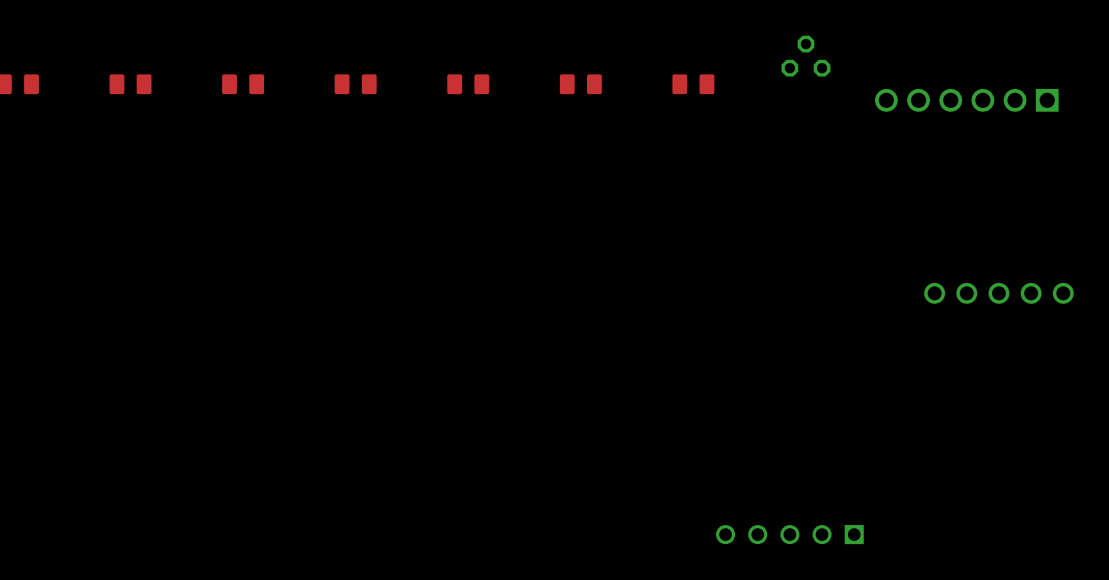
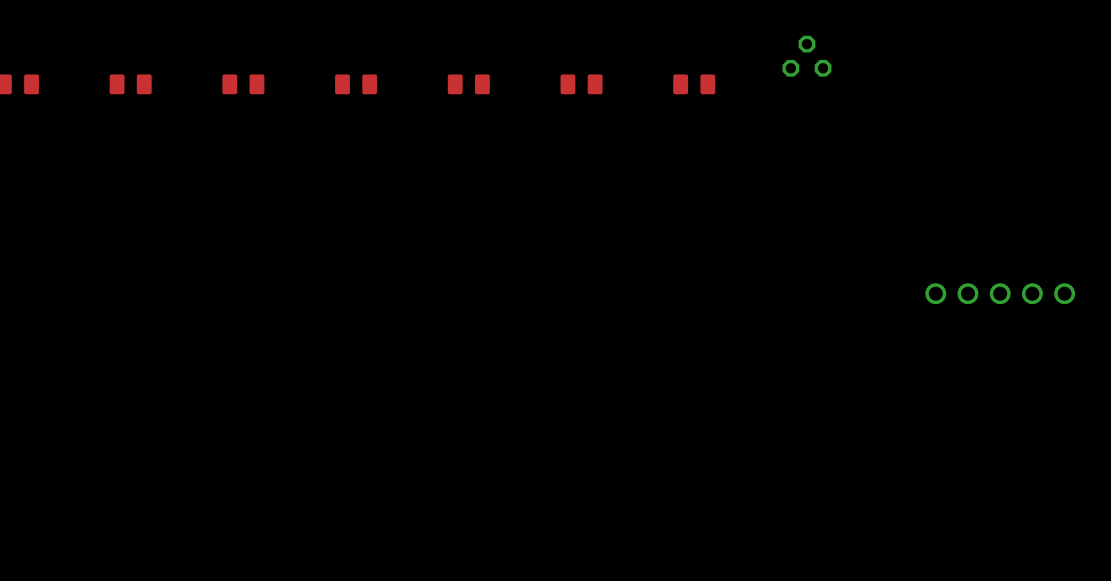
part: (966, 100) -> none
part: (789, 534) -> none

